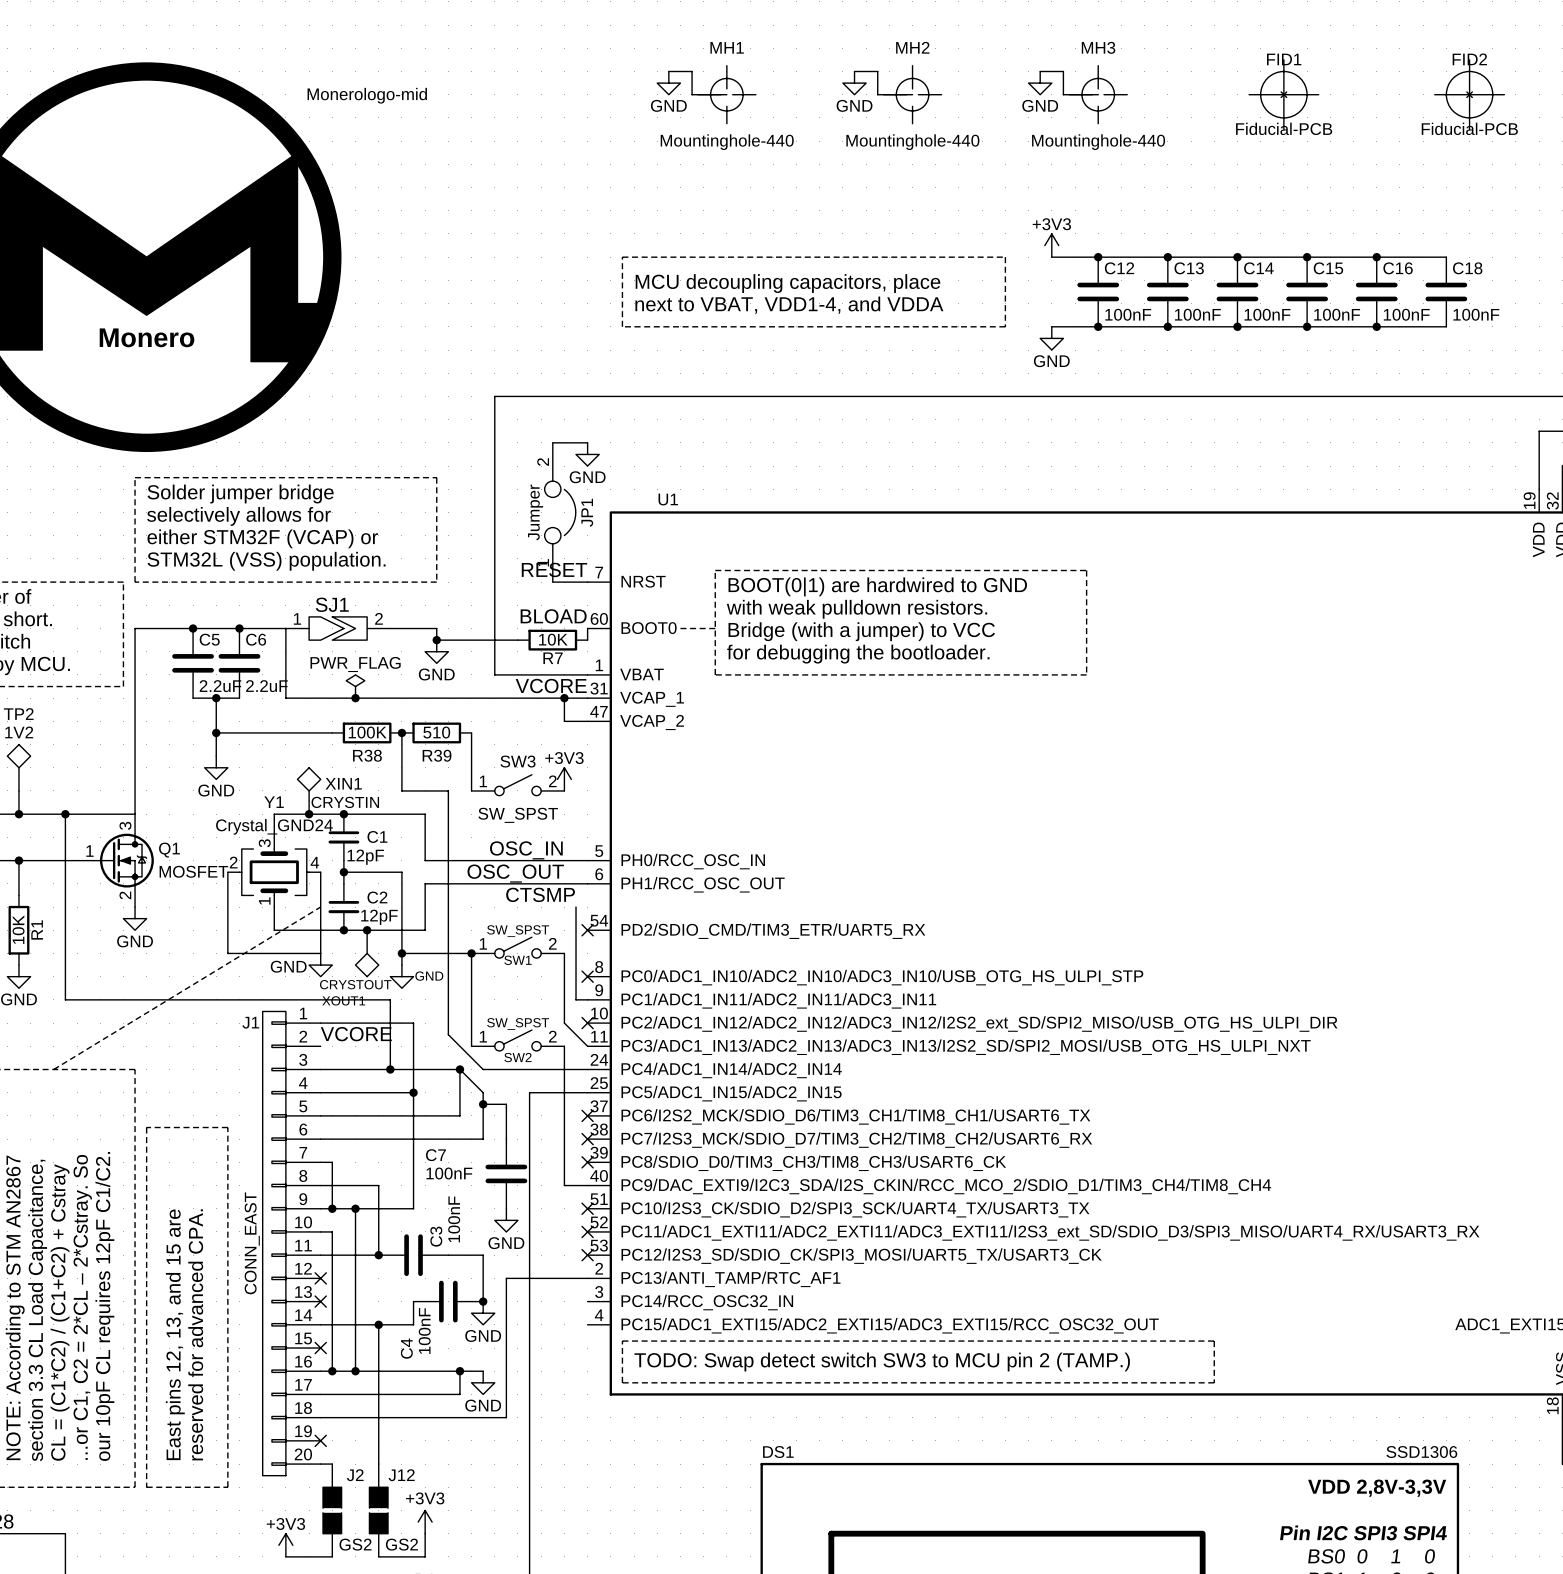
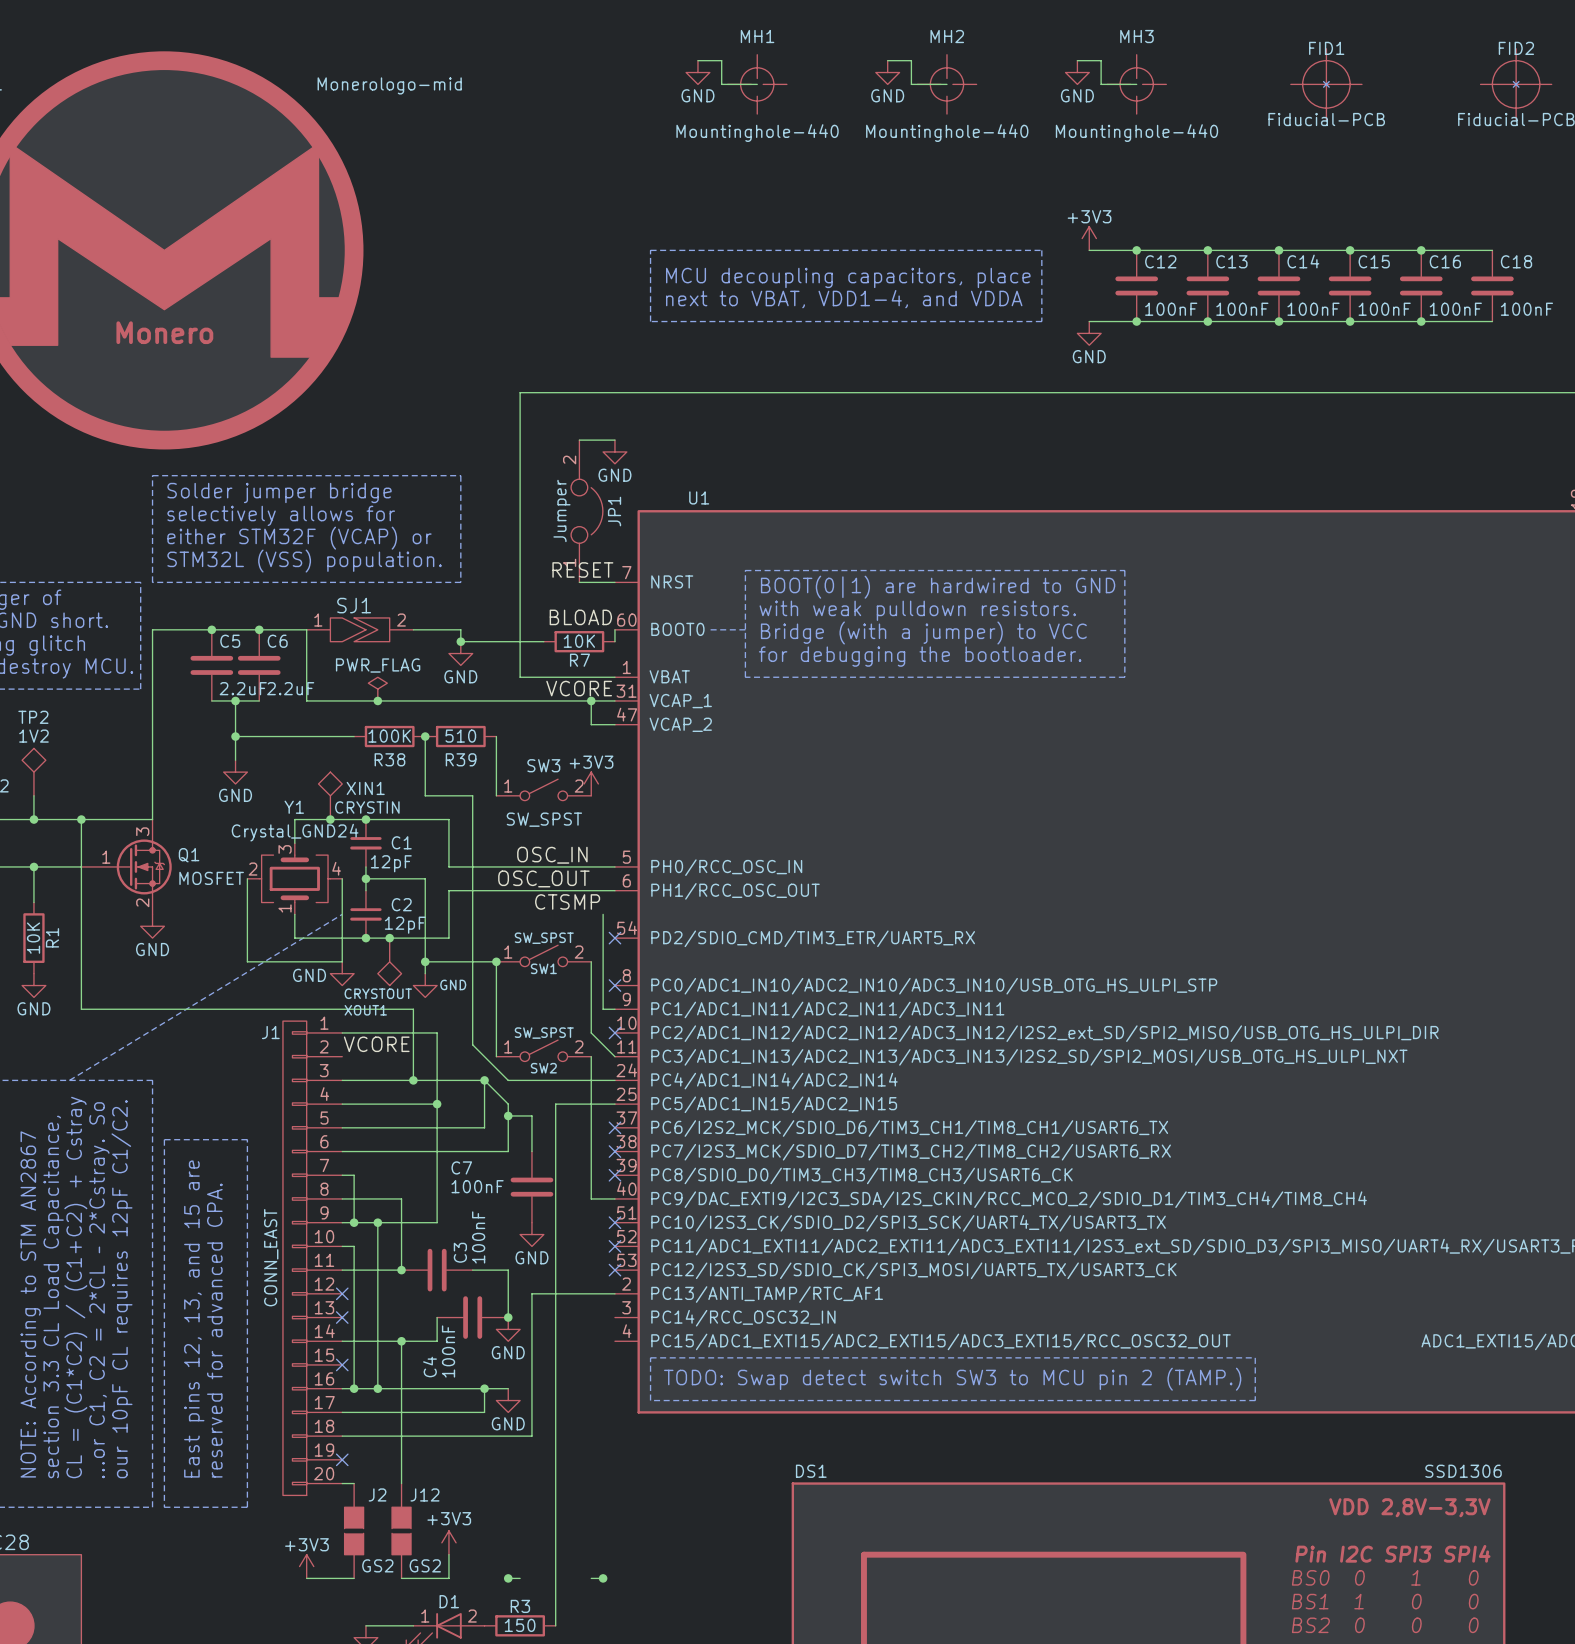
wire: none -> (508, 1578) (520, 1578)
junction: none -> (508, 1578)
wire: none -> (591, 1578) (603, 1578)
junction: none -> (603, 1578)

